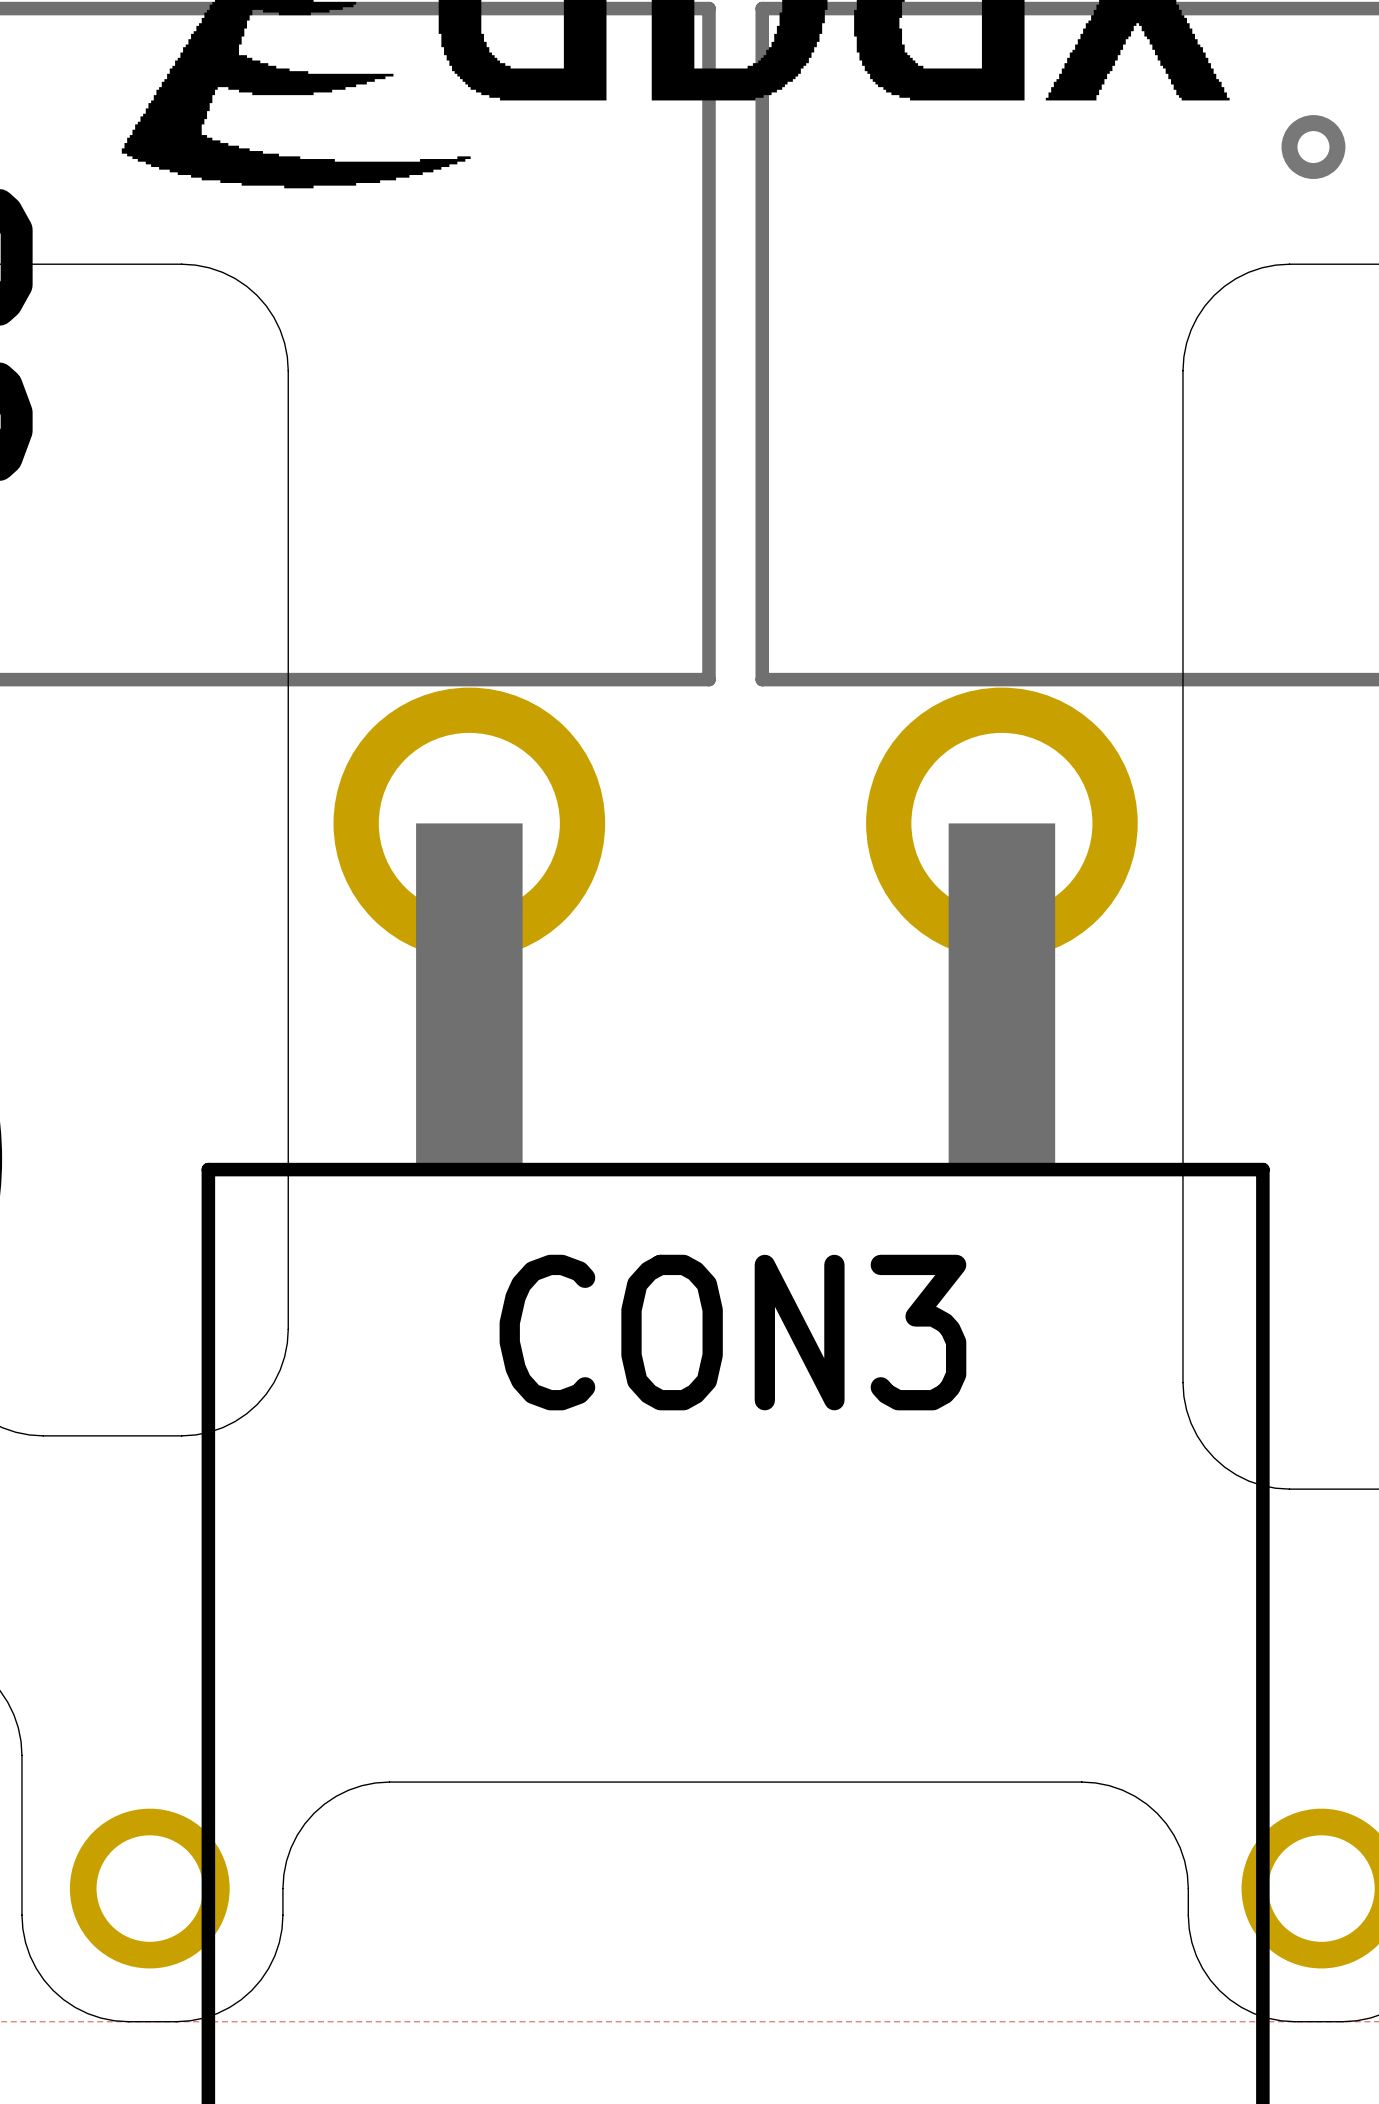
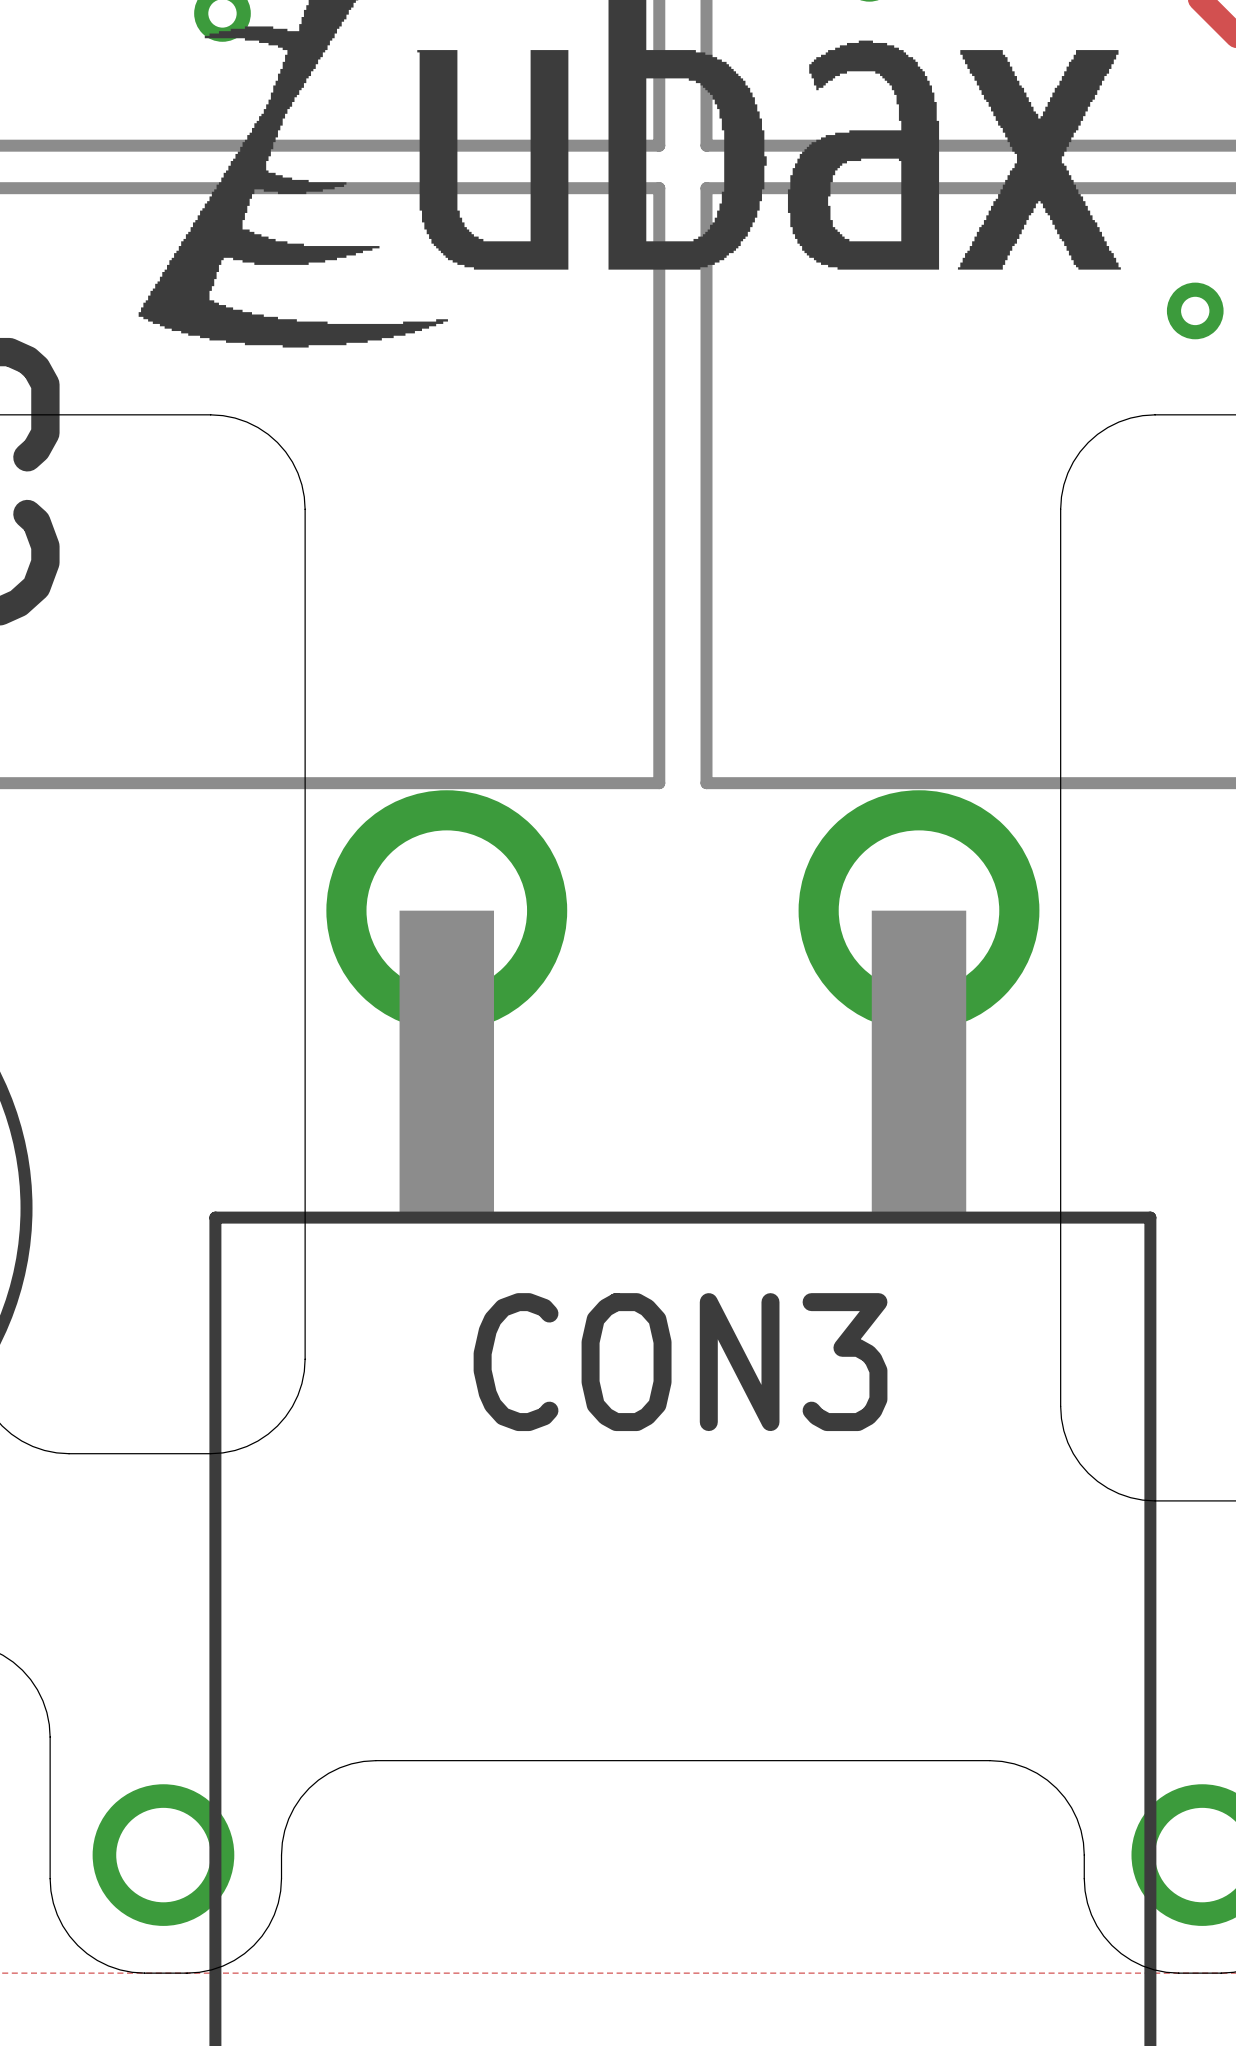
board edge: (181, 264) (209, 267) (222, 272) (246, 286) (257, 295) (266, 305) (280, 329) (284, 343) (288, 370) (287, 1343) (280, 1370) (273, 1382) (266, 1394) (246, 1413) (222, 1427) (209, 1432) (181, 1435) -> (191, 414) (223, 415) (235, 418) (246, 422) (268, 434) (285, 451) (297, 473) (301, 484) (305, 509) (304, 1371) (297, 1395) (292, 1406) (285, 1416) (268, 1434) (246, 1446) (235, 1450) (223, 1452) (191, 1453)
board edge: (1289, 264) (1261, 267) (1248, 272) (1224, 286) (1214, 295) (1204, 305) (1191, 329) (1186, 343) (1182, 370) (1183, 1396) (1191, 1423) (1197, 1435) (1204, 1447) (1224, 1467) (1248, 1481) (1261, 1485) (1289, 1489) -> (1173, 414) (1142, 415) (1130, 418) (1118, 422) (1097, 434) (1080, 451) (1067, 473) (1063, 484) (1060, 509) (1061, 1418) (1067, 1442) (1073, 1453) (1080, 1463) (1097, 1481) (1118, 1493) (1130, 1497) (1142, 1500) (1173, 1500)

